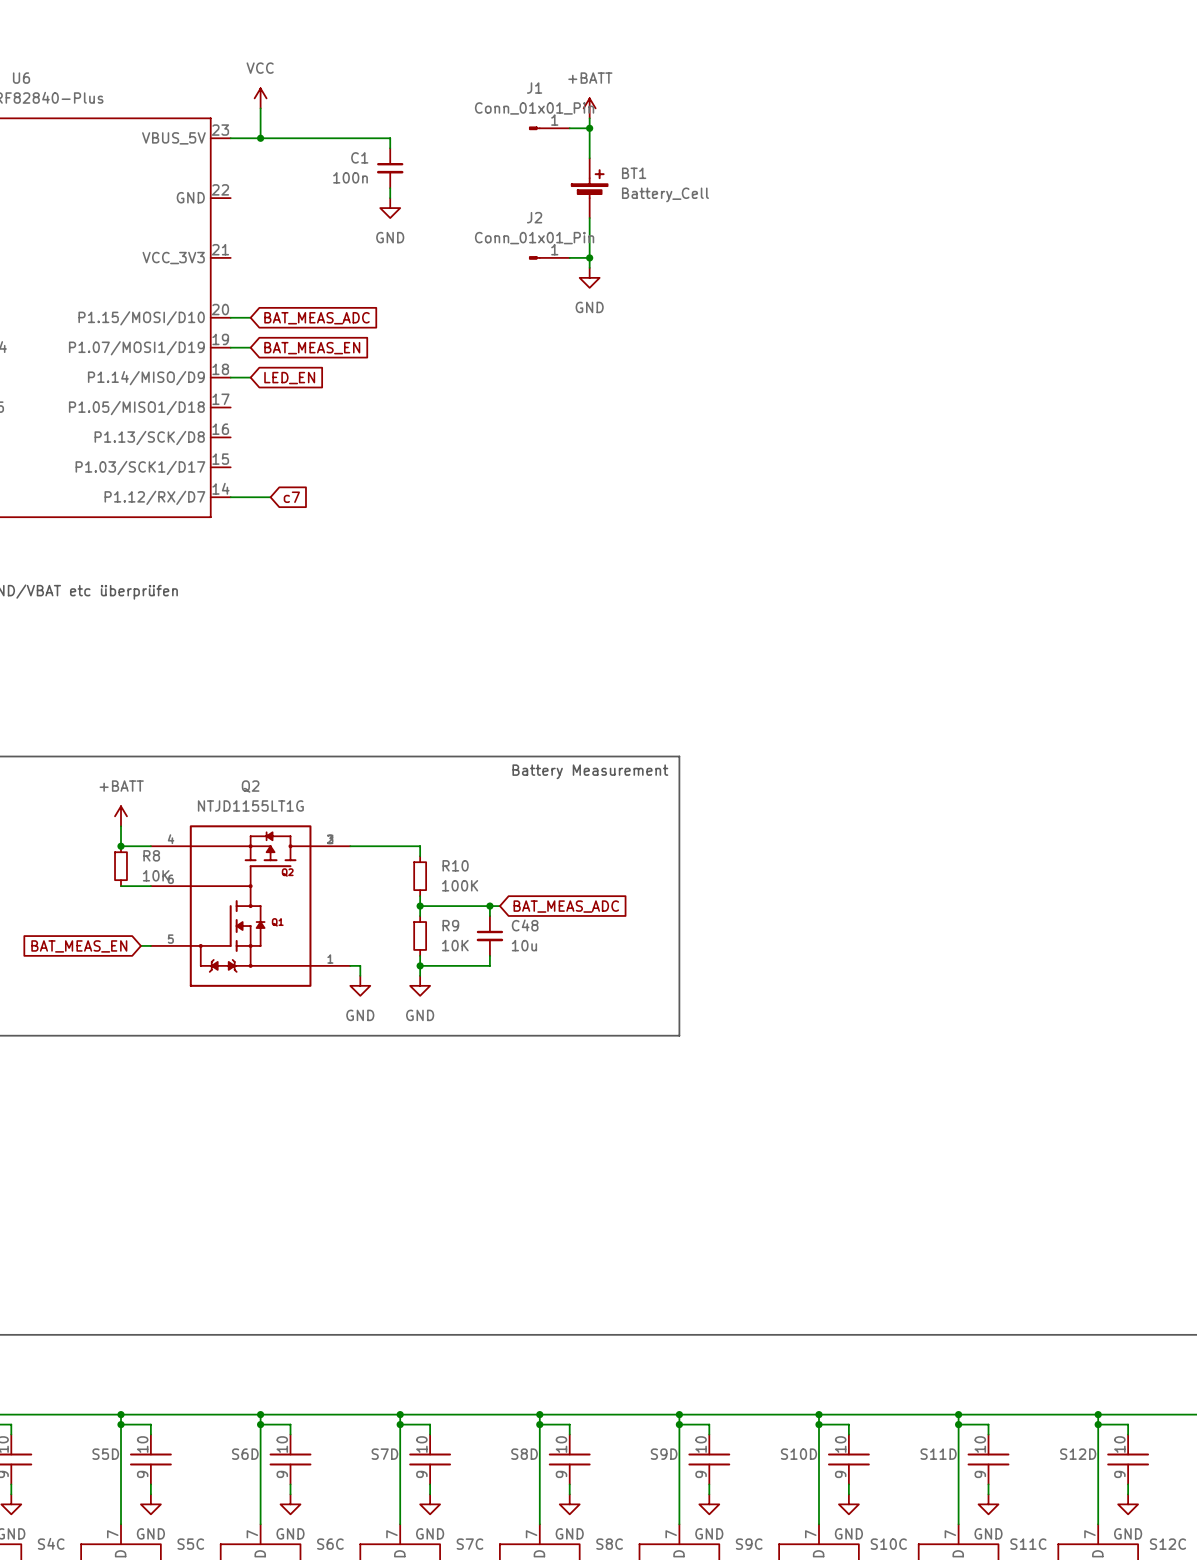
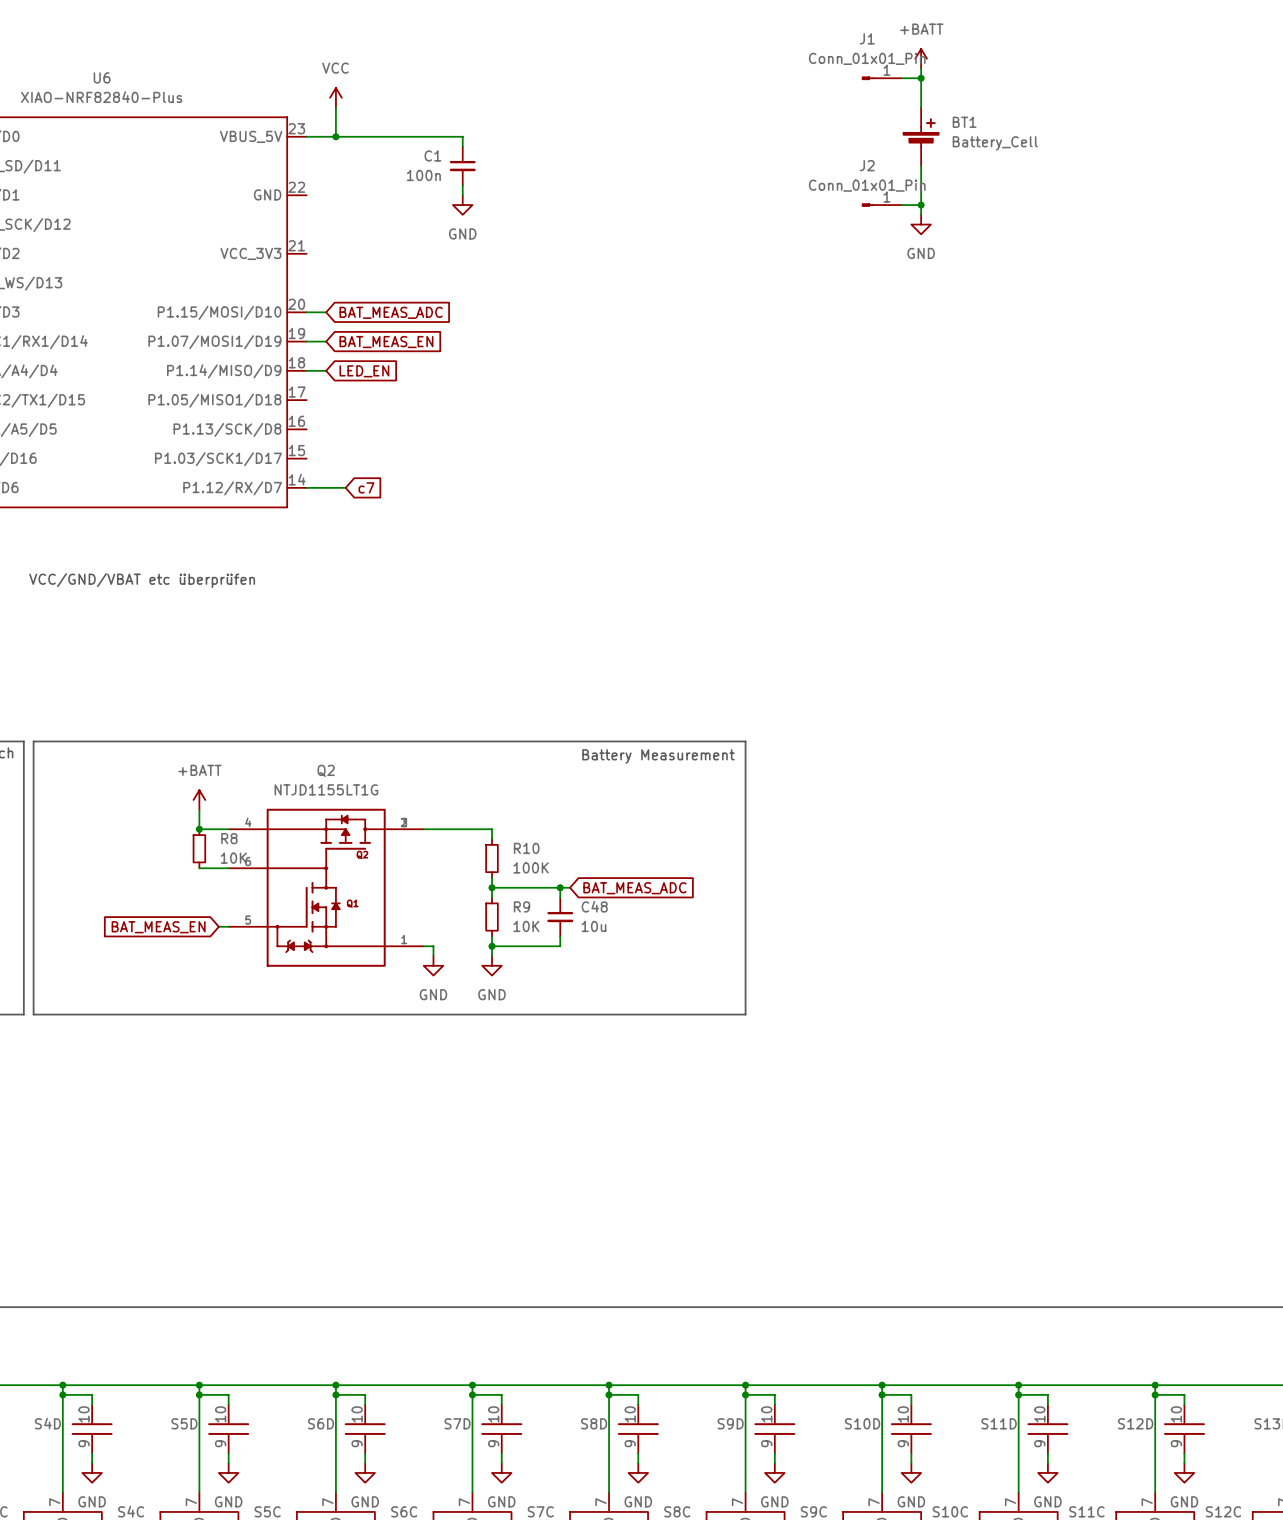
power symbol: none -> +BATT (921, 58)
wire: none -> (921, 68) (921, 107)
wire: none -> (901, 78) (921, 78)
junction: none -> (921, 78)
power symbol: +BATT (589, 108) -> none
wire: (589, 118) (589, 158) -> none
J1 position: (549, 128) -> (881, 78)
wire: (569, 128) (589, 128) -> none
junction: (589, 128) -> none
wire: none -> (921, 166) (921, 214)
BT1 position: (589, 188) -> (921, 136)
wire: none -> (901, 205) (921, 205)
junction: none -> (921, 205)
wire: (589, 218) (589, 267) -> none
power symbol: none -> GND (921, 224)
J2 position: (549, 257) -> (881, 205)
wire: (569, 257) (589, 257) -> none
junction: (589, 257) -> none
power symbol: GND (589, 277) -> none

